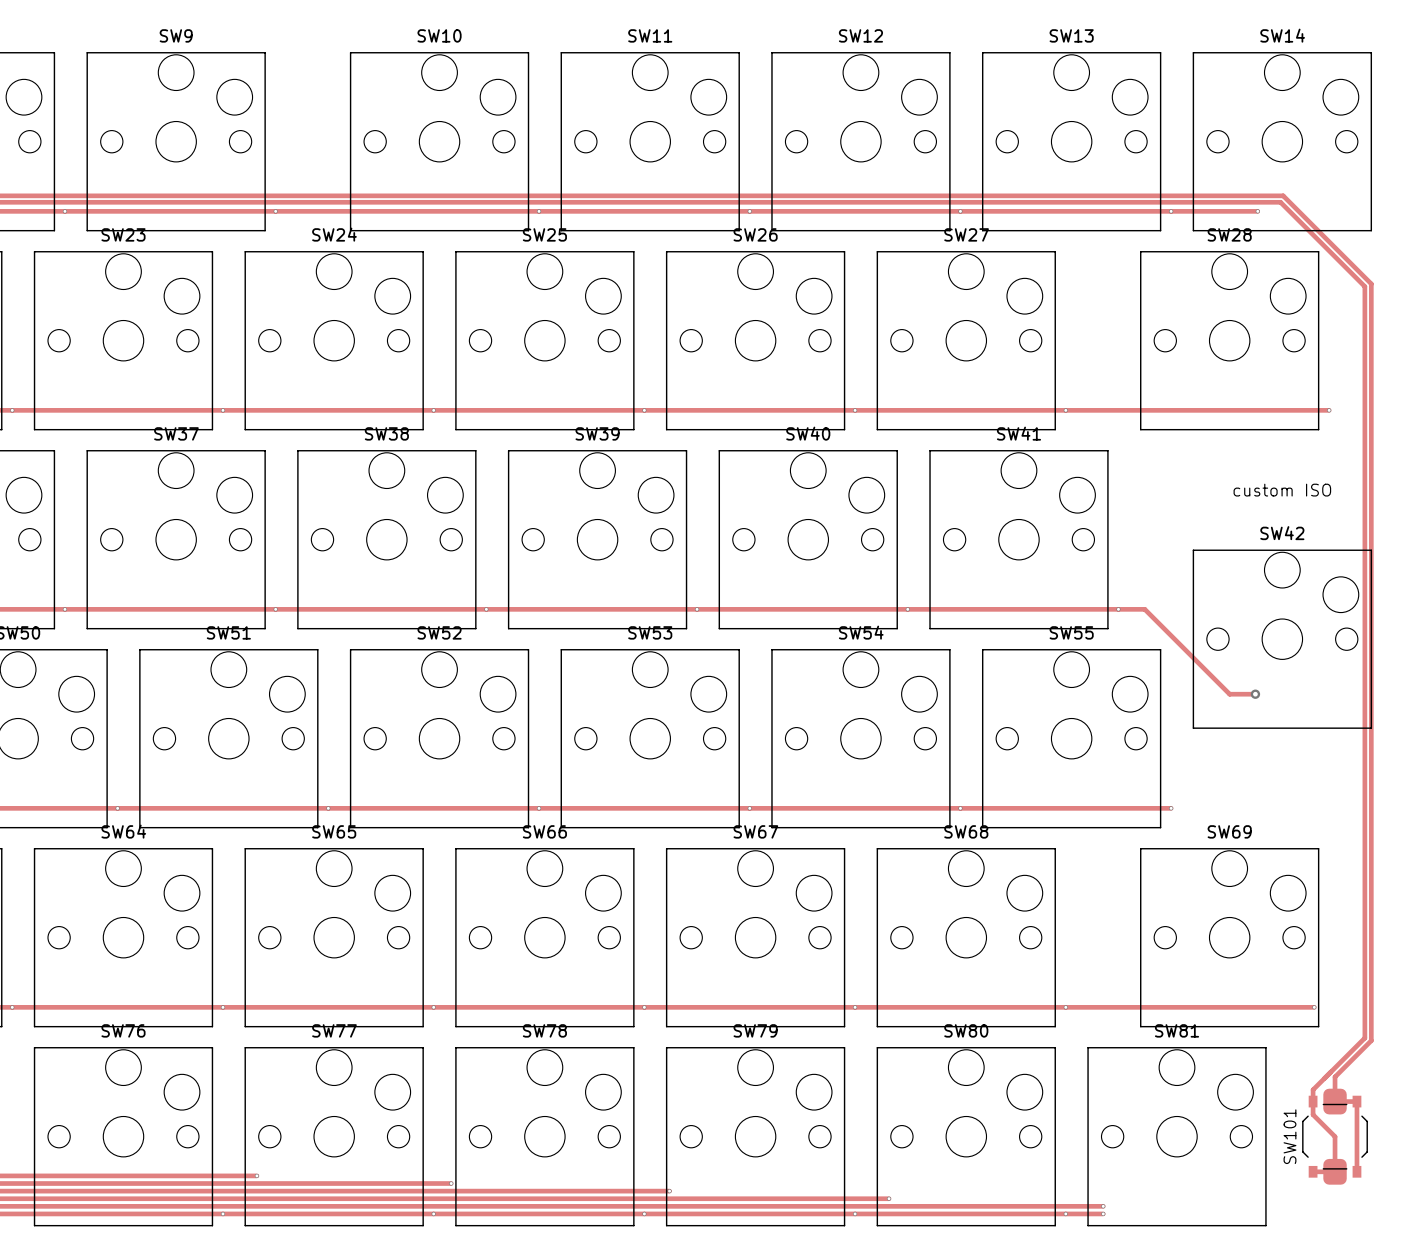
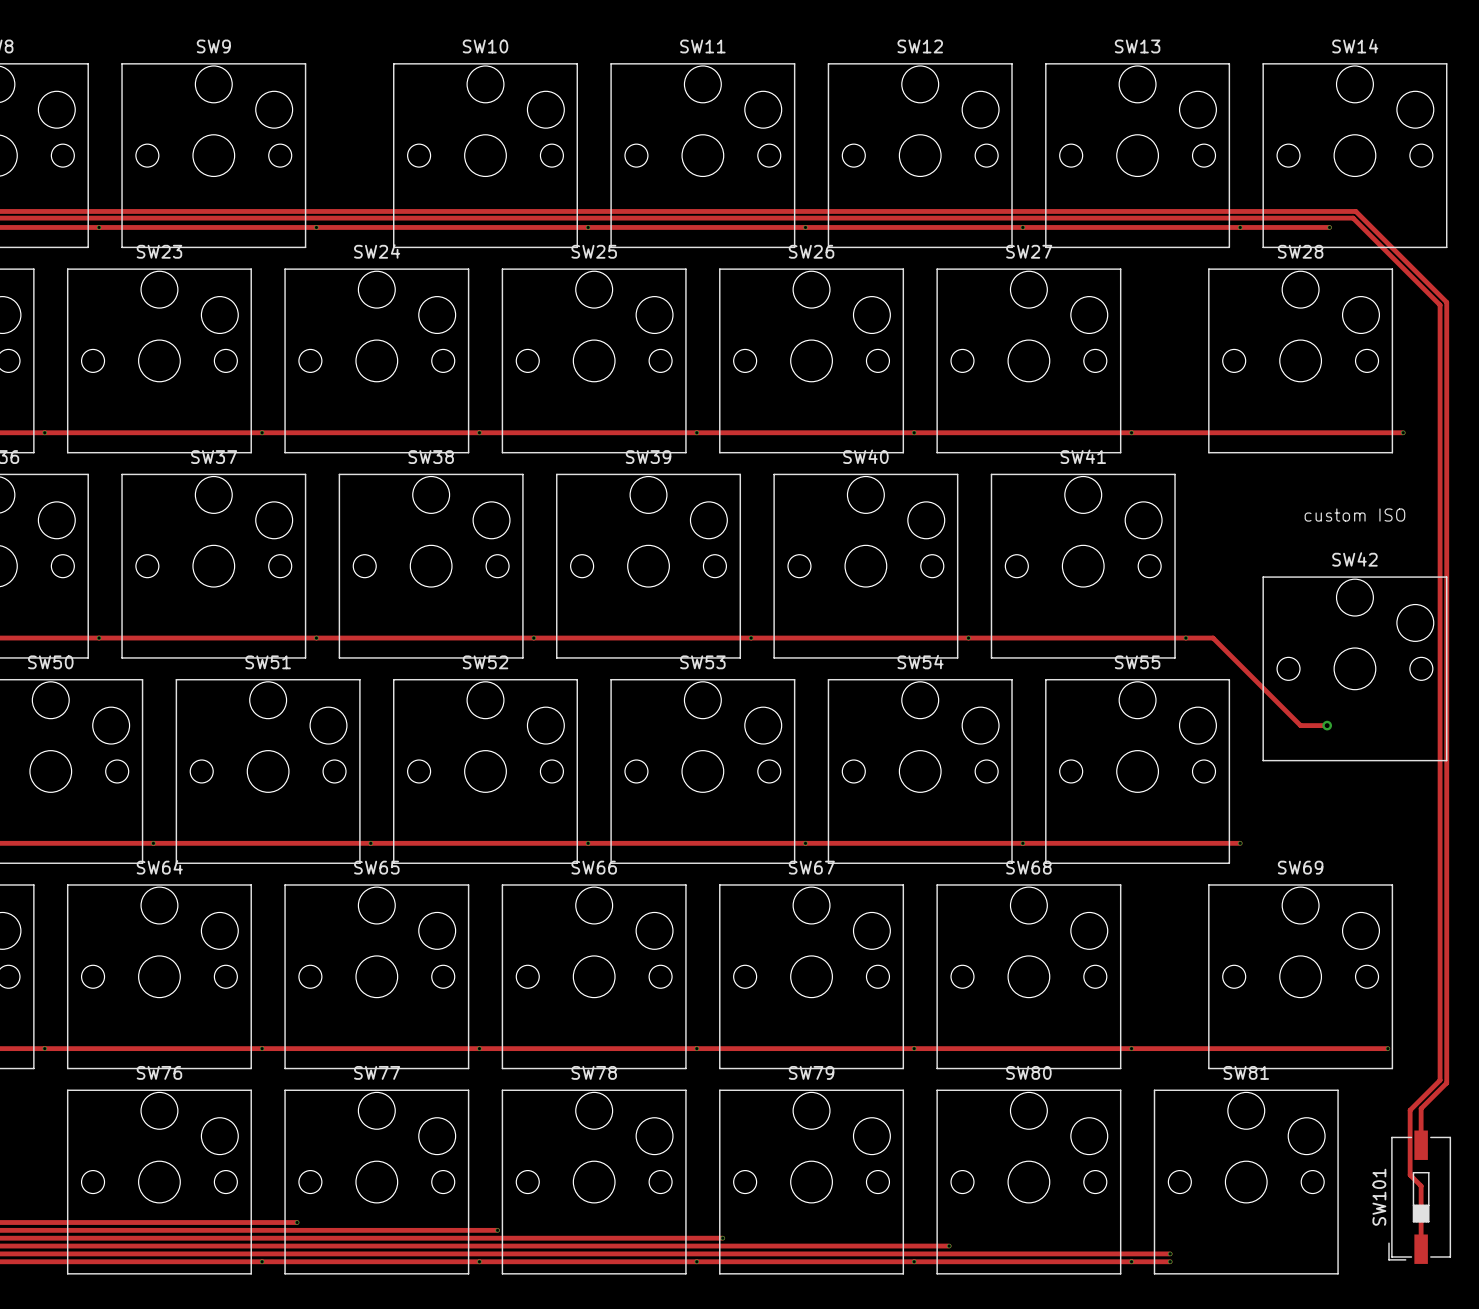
track: (1346, 1065) (1335, 1076) (1335, 1101) (1356, 1101) (1356, 1171) -> (1421, 1108) (1421, 1145)
track: (1335, 1067) (1313, 1089) (1313, 1114) (1335, 1136) (1335, 1171) (1313, 1171) -> (1410, 1110) (1410, 1175) (1421, 1186) (1421, 1249)
SW101 footprint: [1302, 1088, 1368, 1185] -> [1388, 1130, 1452, 1264]

